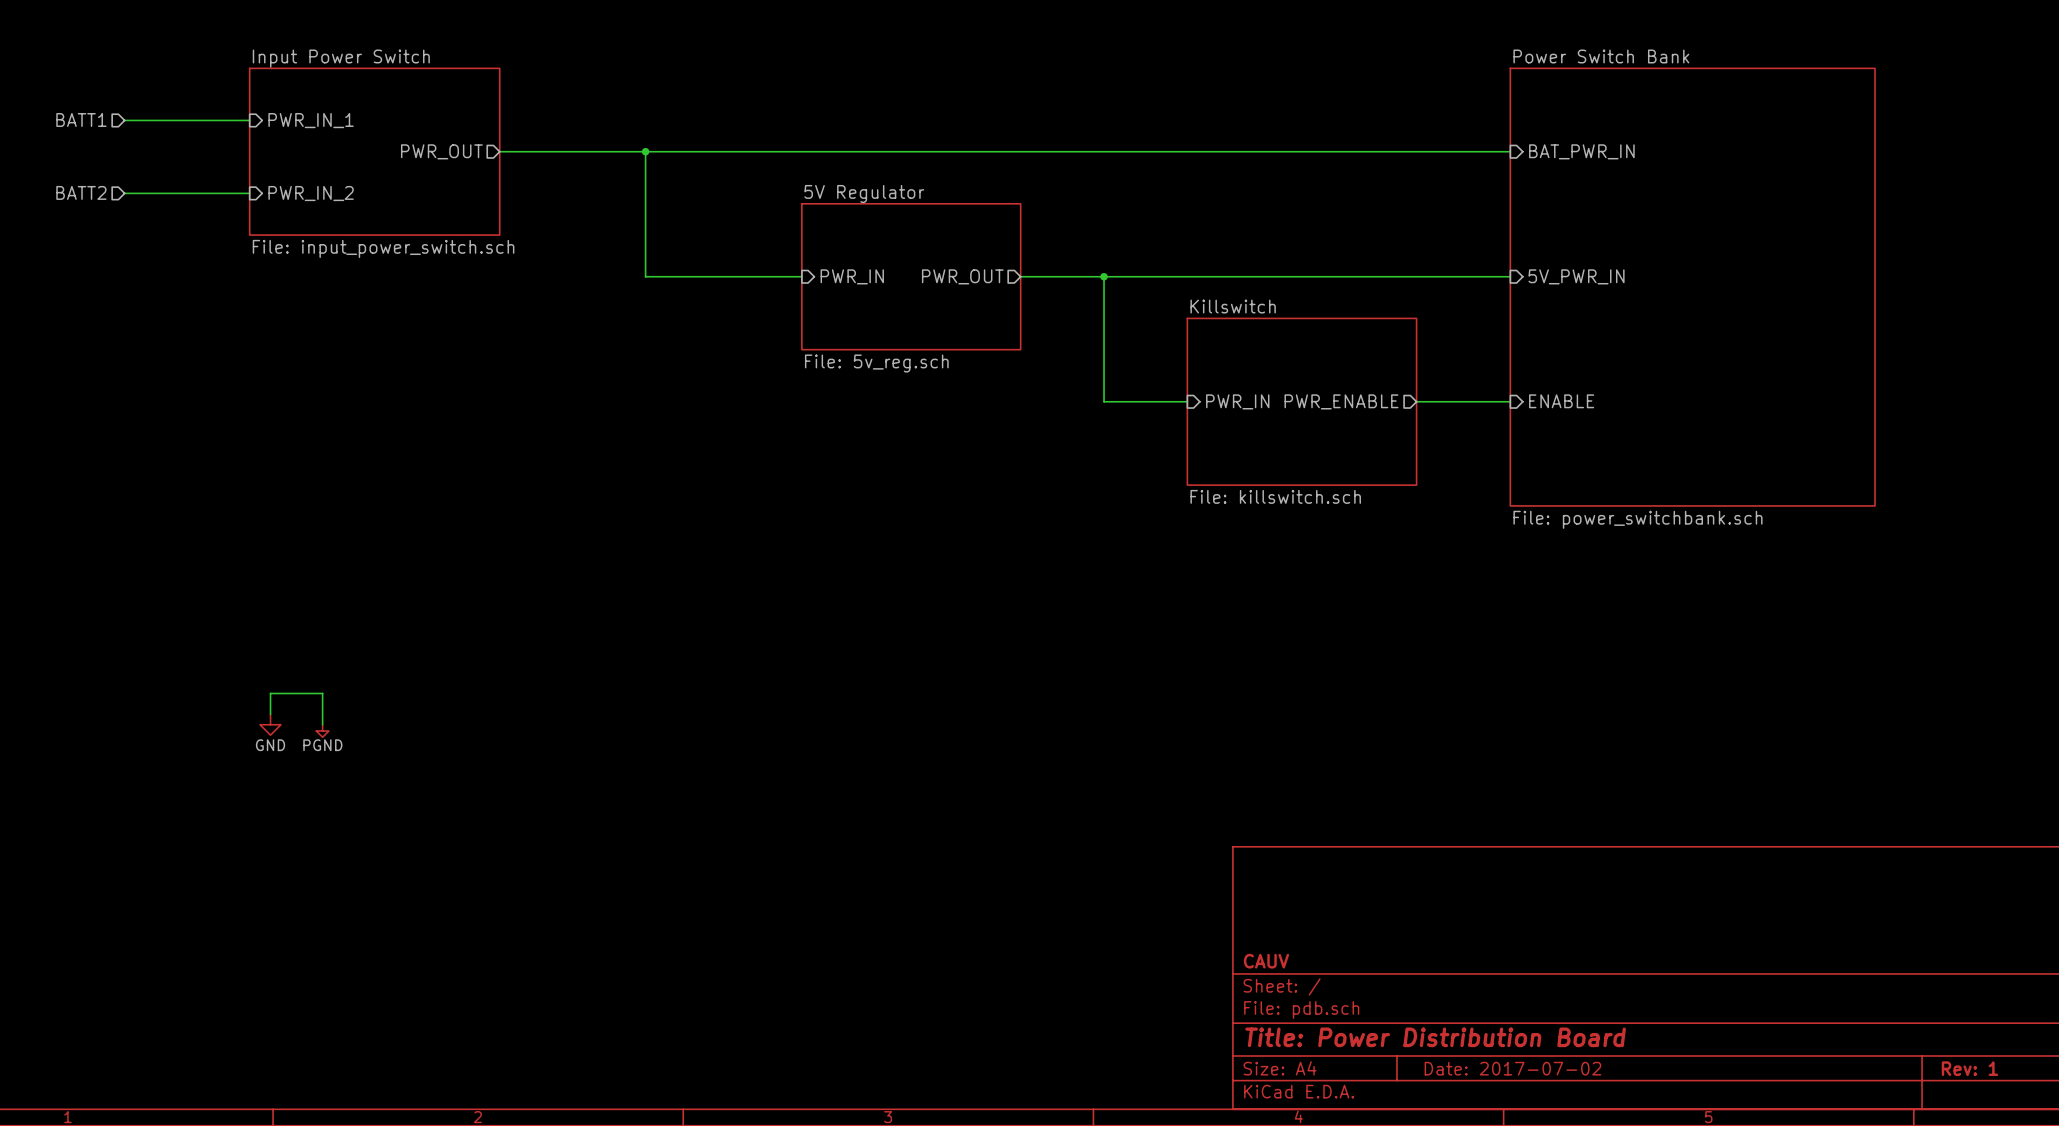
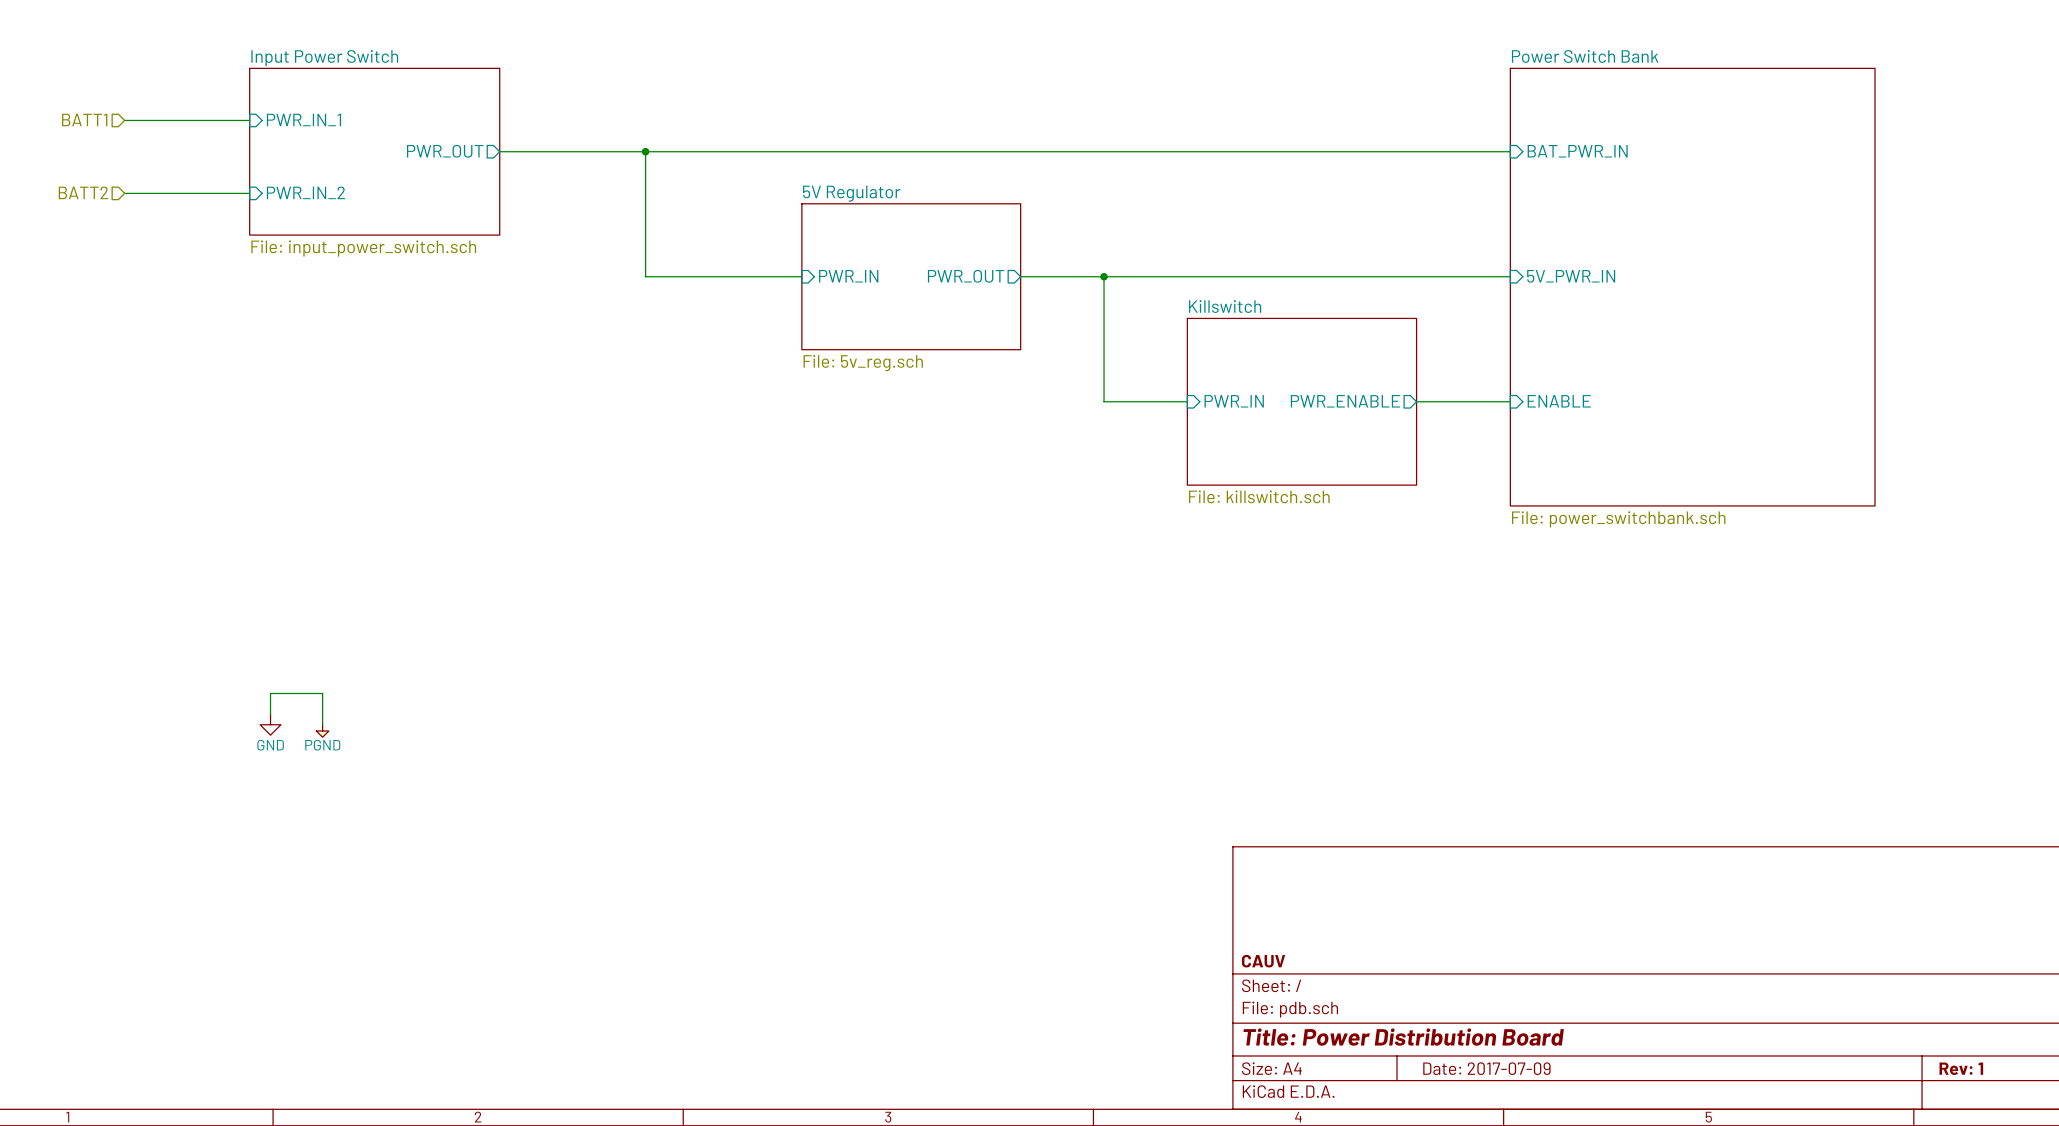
title block: Date: 2017-07-02 (1512, 1068) -> Date: 2017-07-09 (1486, 1068)

